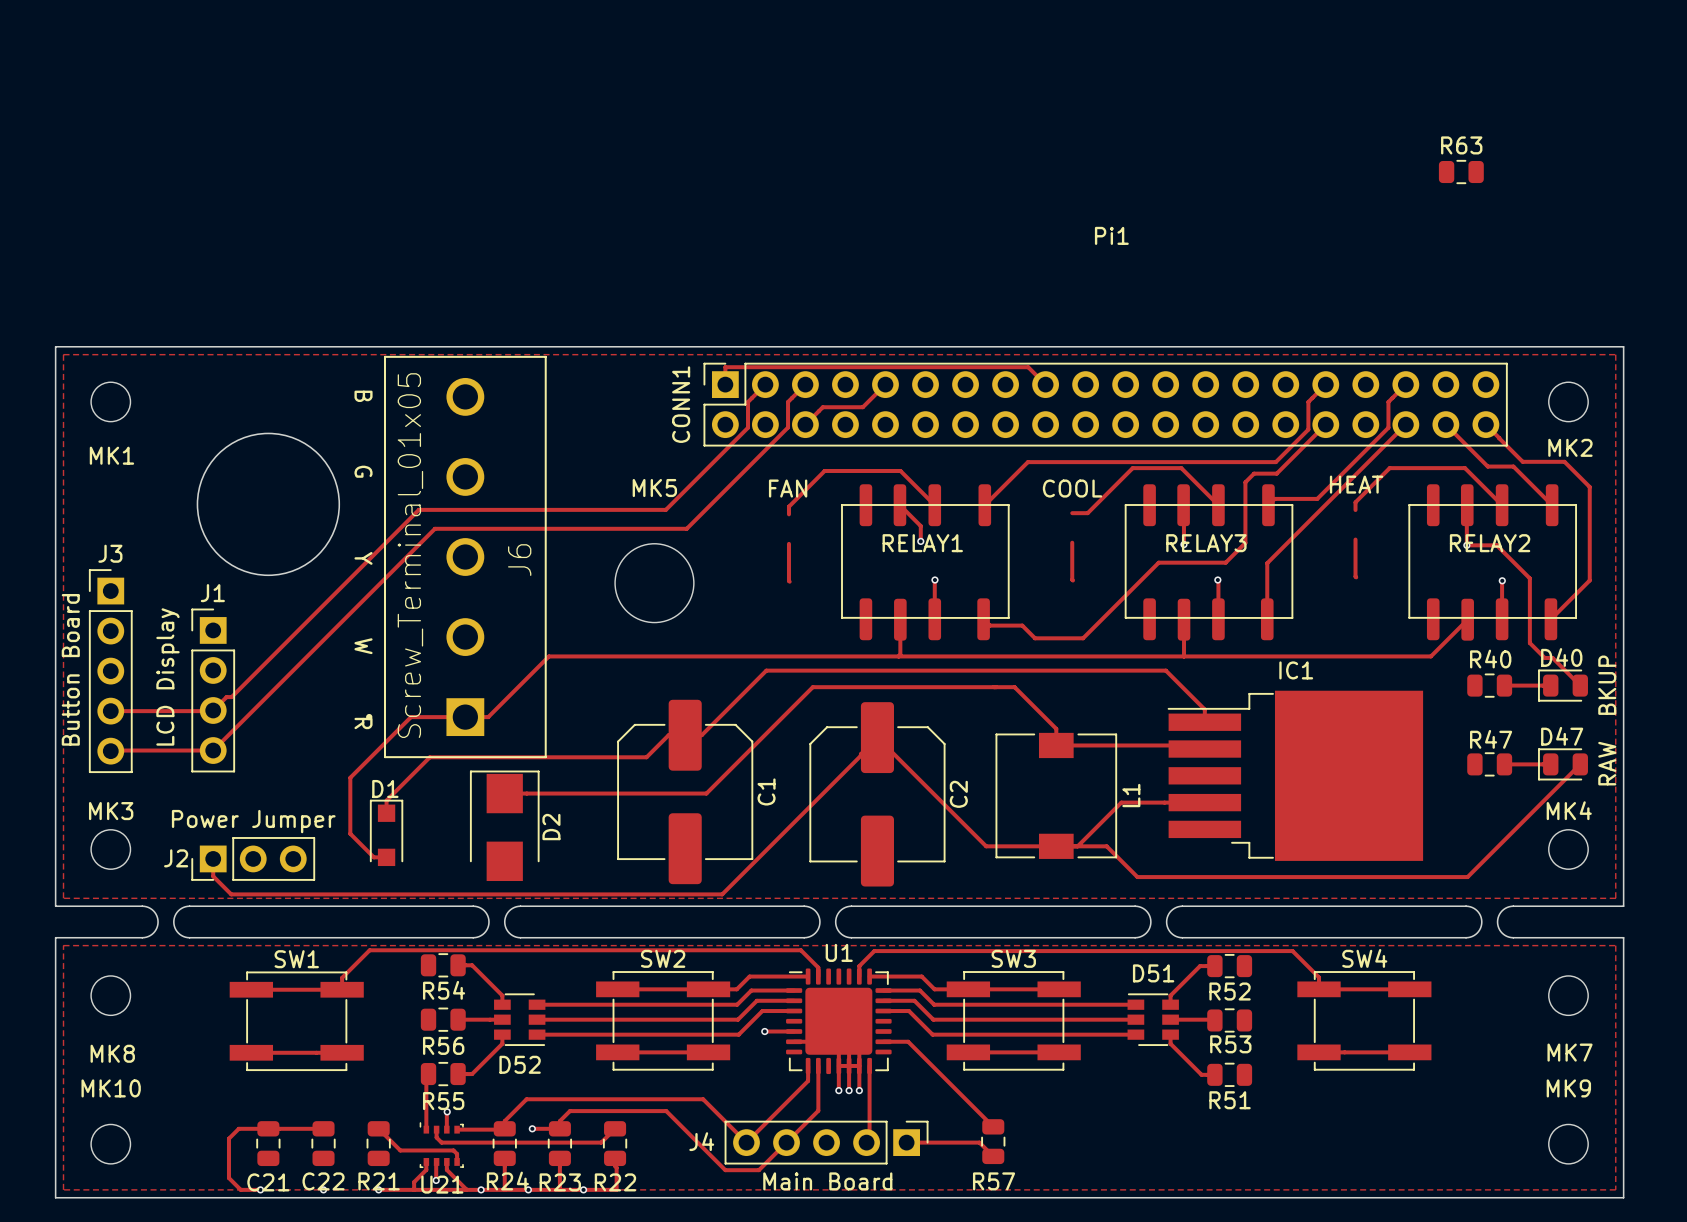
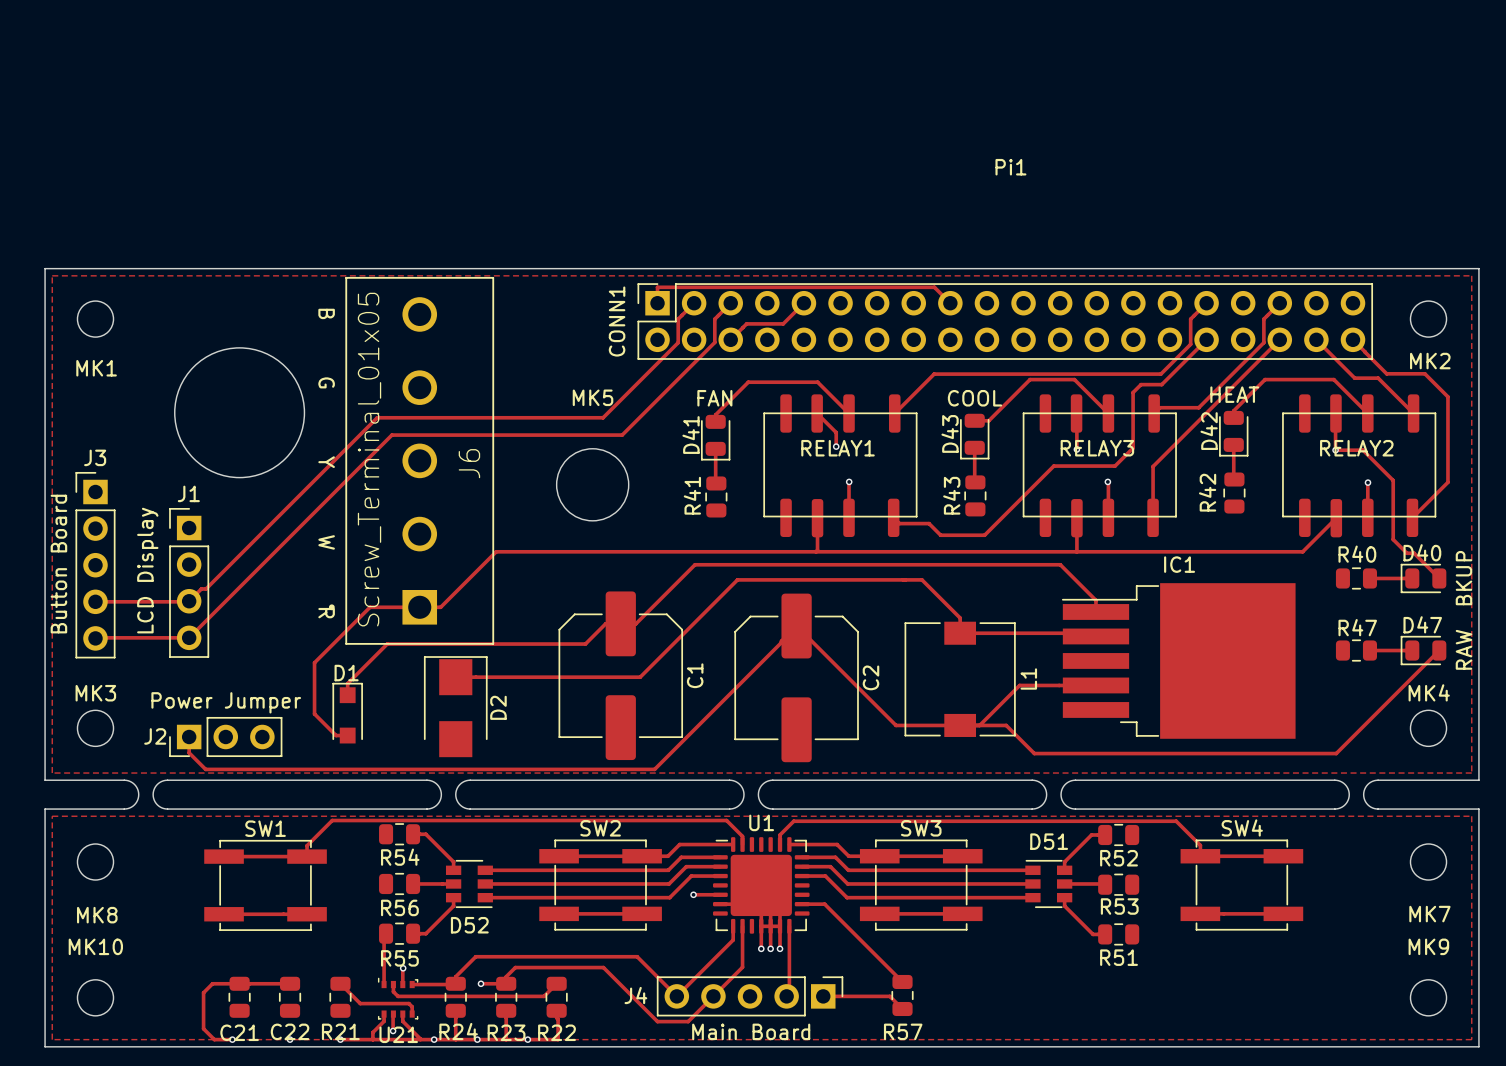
R63: (1461, 172) -> none
D42: none -> (1233, 433)
D43: none -> (974, 436)
D41: none -> (715, 437)
R42: none -> (1234, 493)
R43: none -> (975, 495)
R41: none -> (716, 496)

